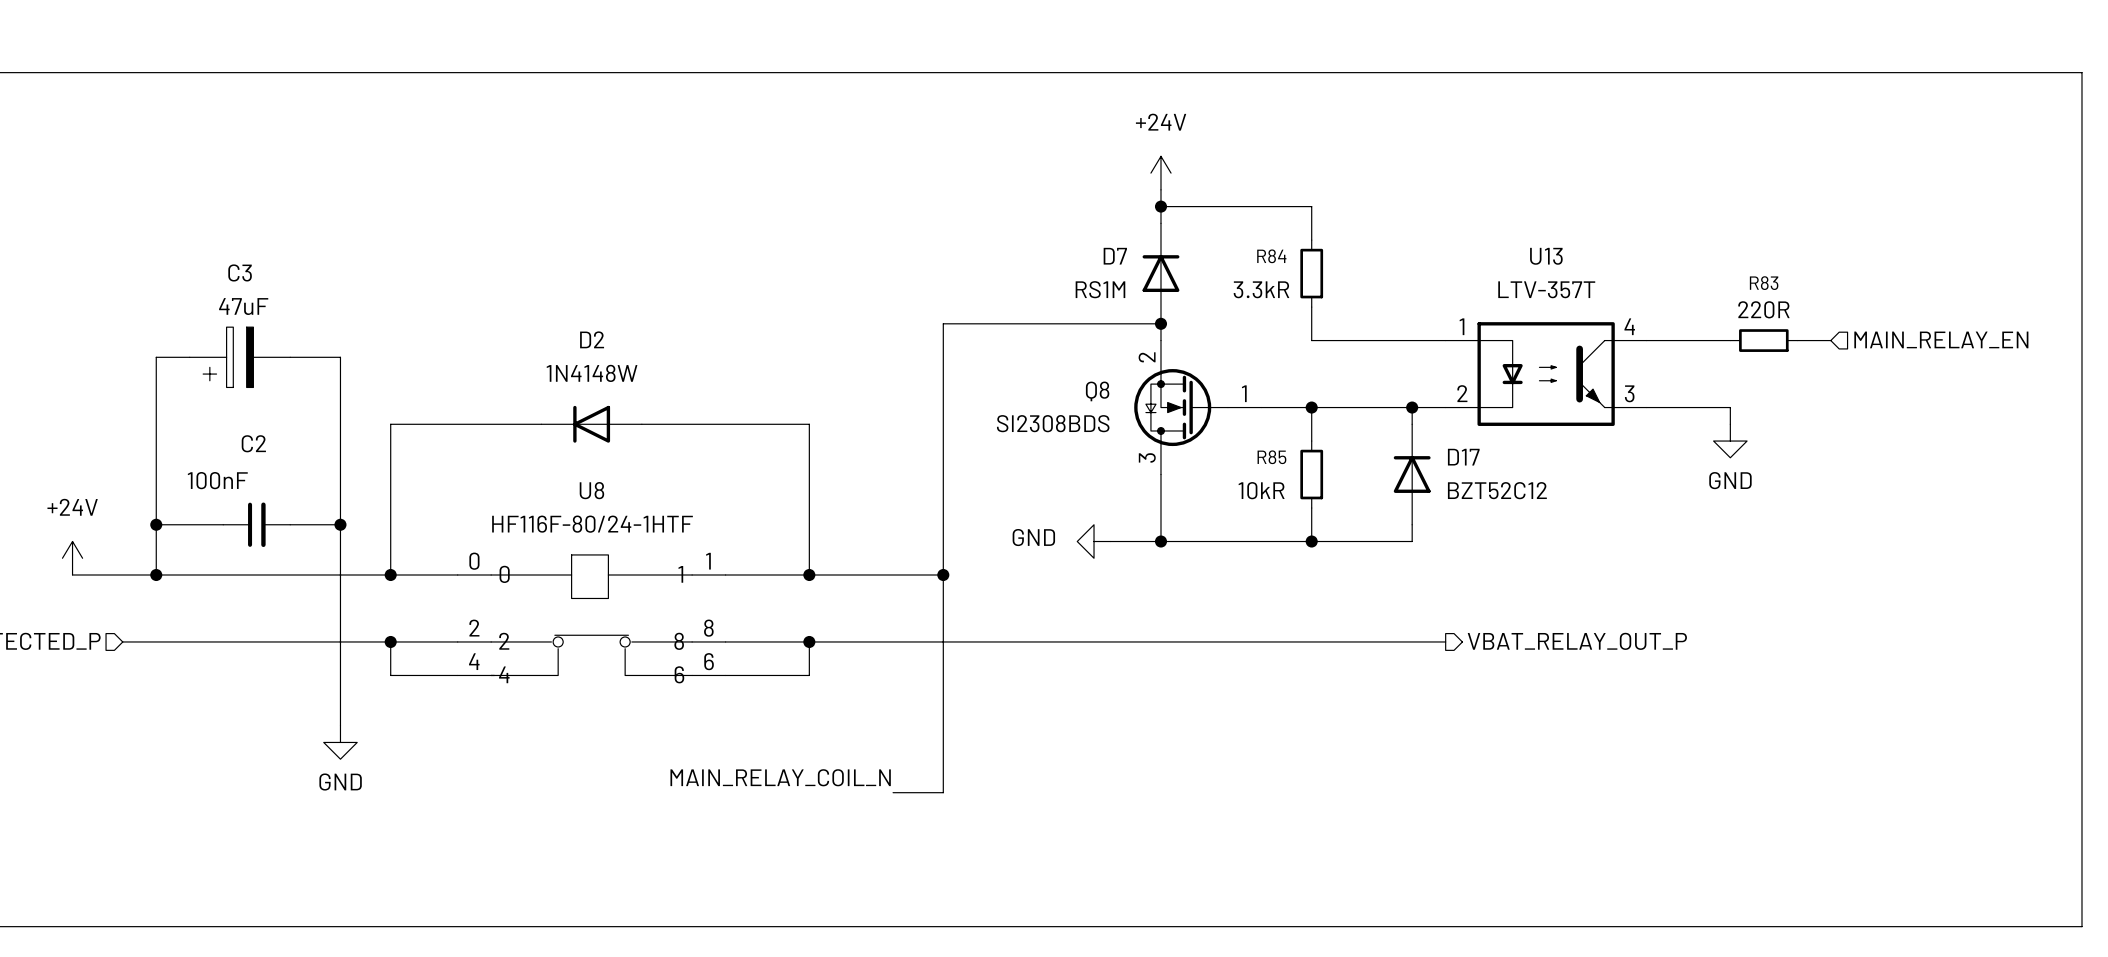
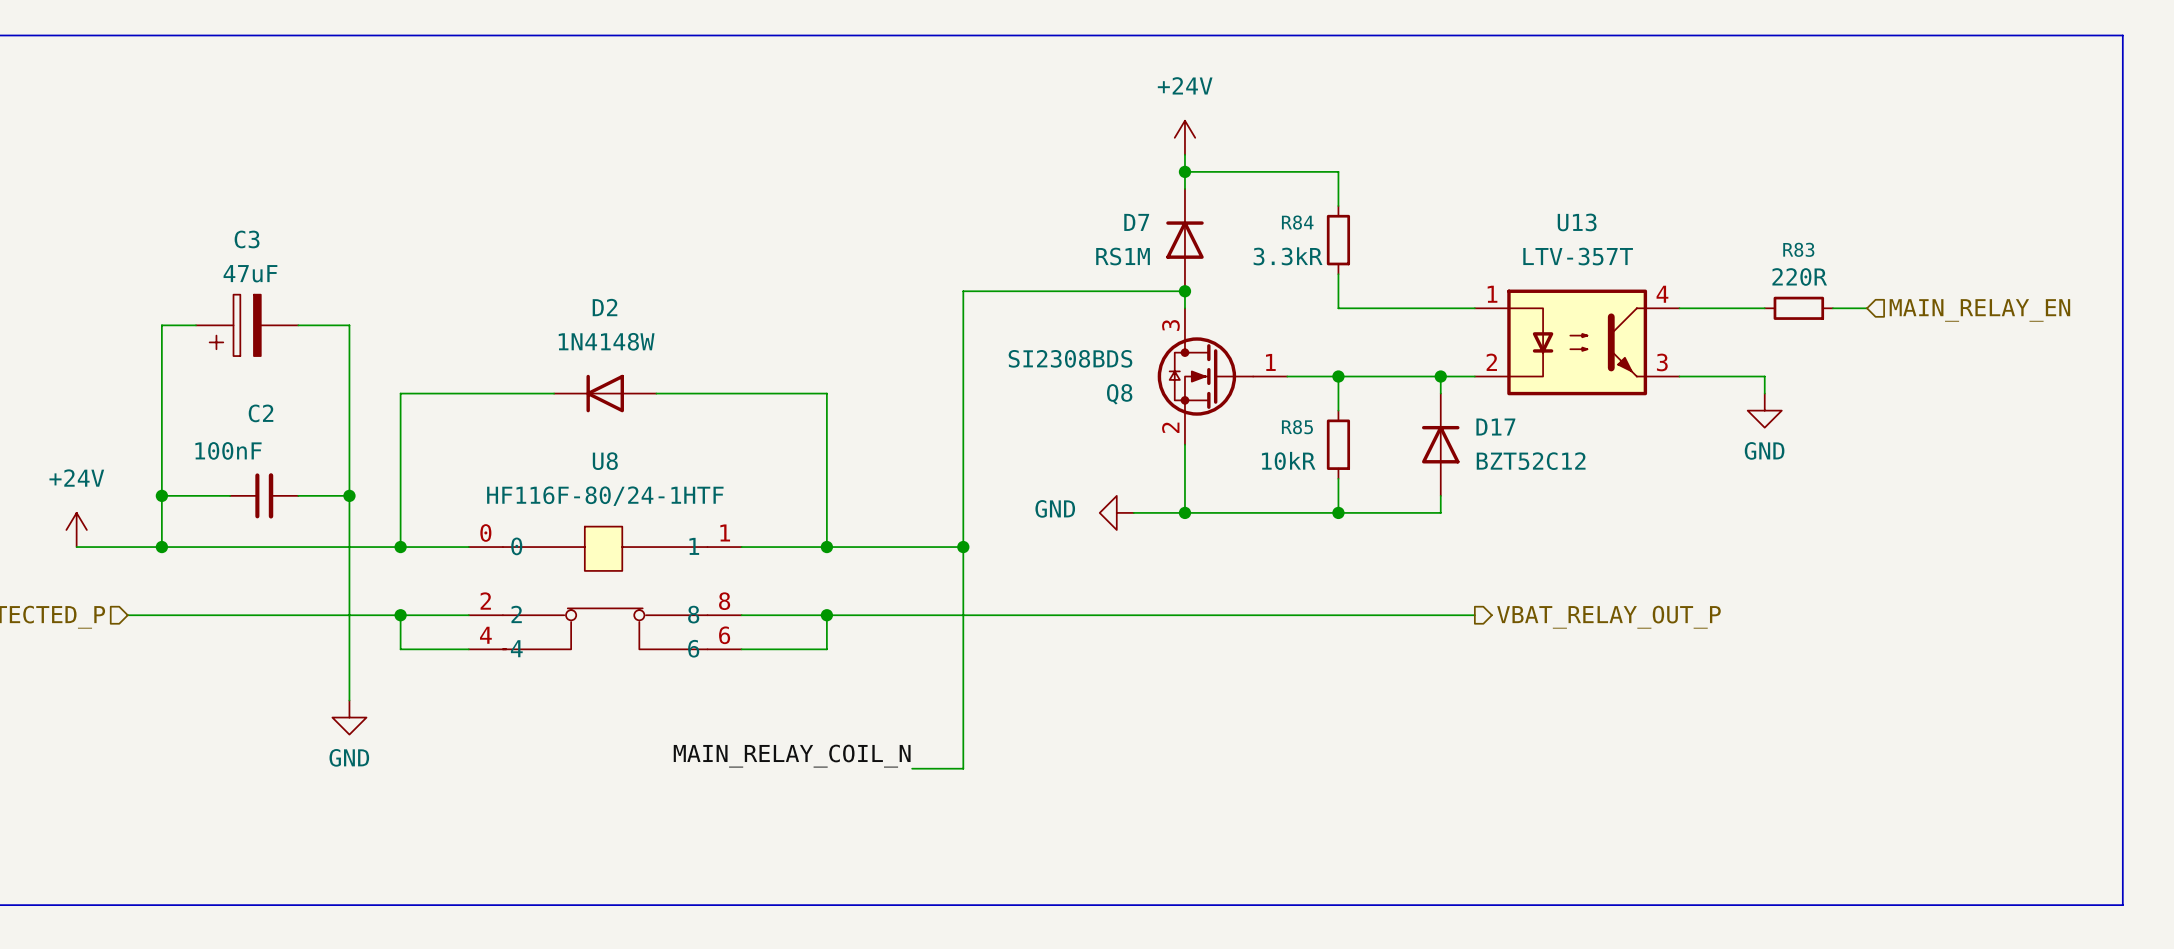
Q8 flip: as is (1181, 407) -> up-down (1205, 376)

